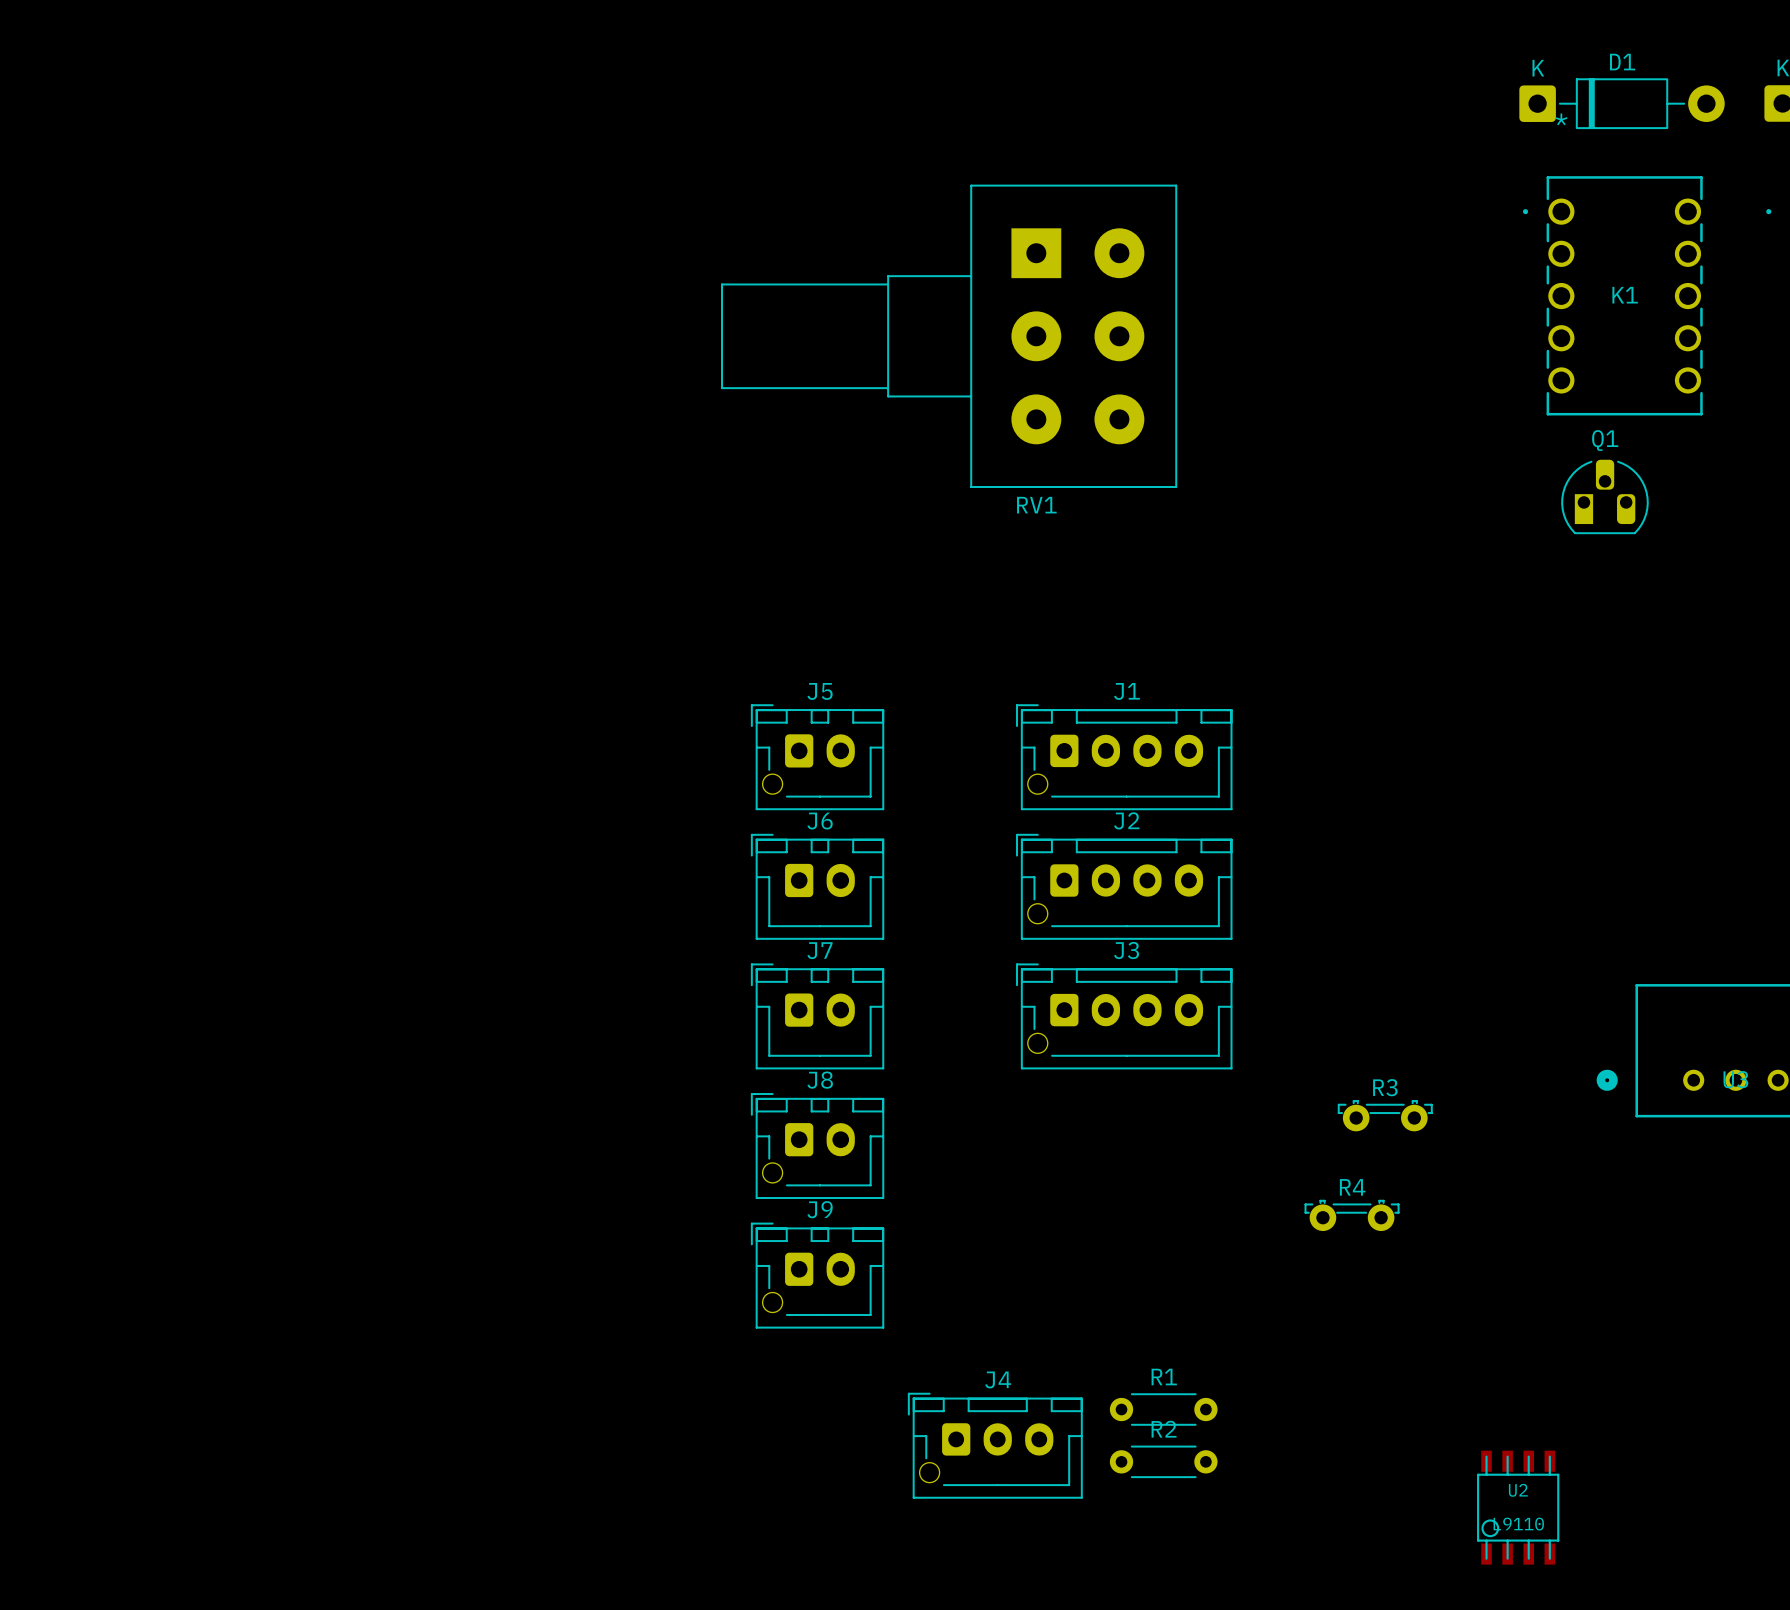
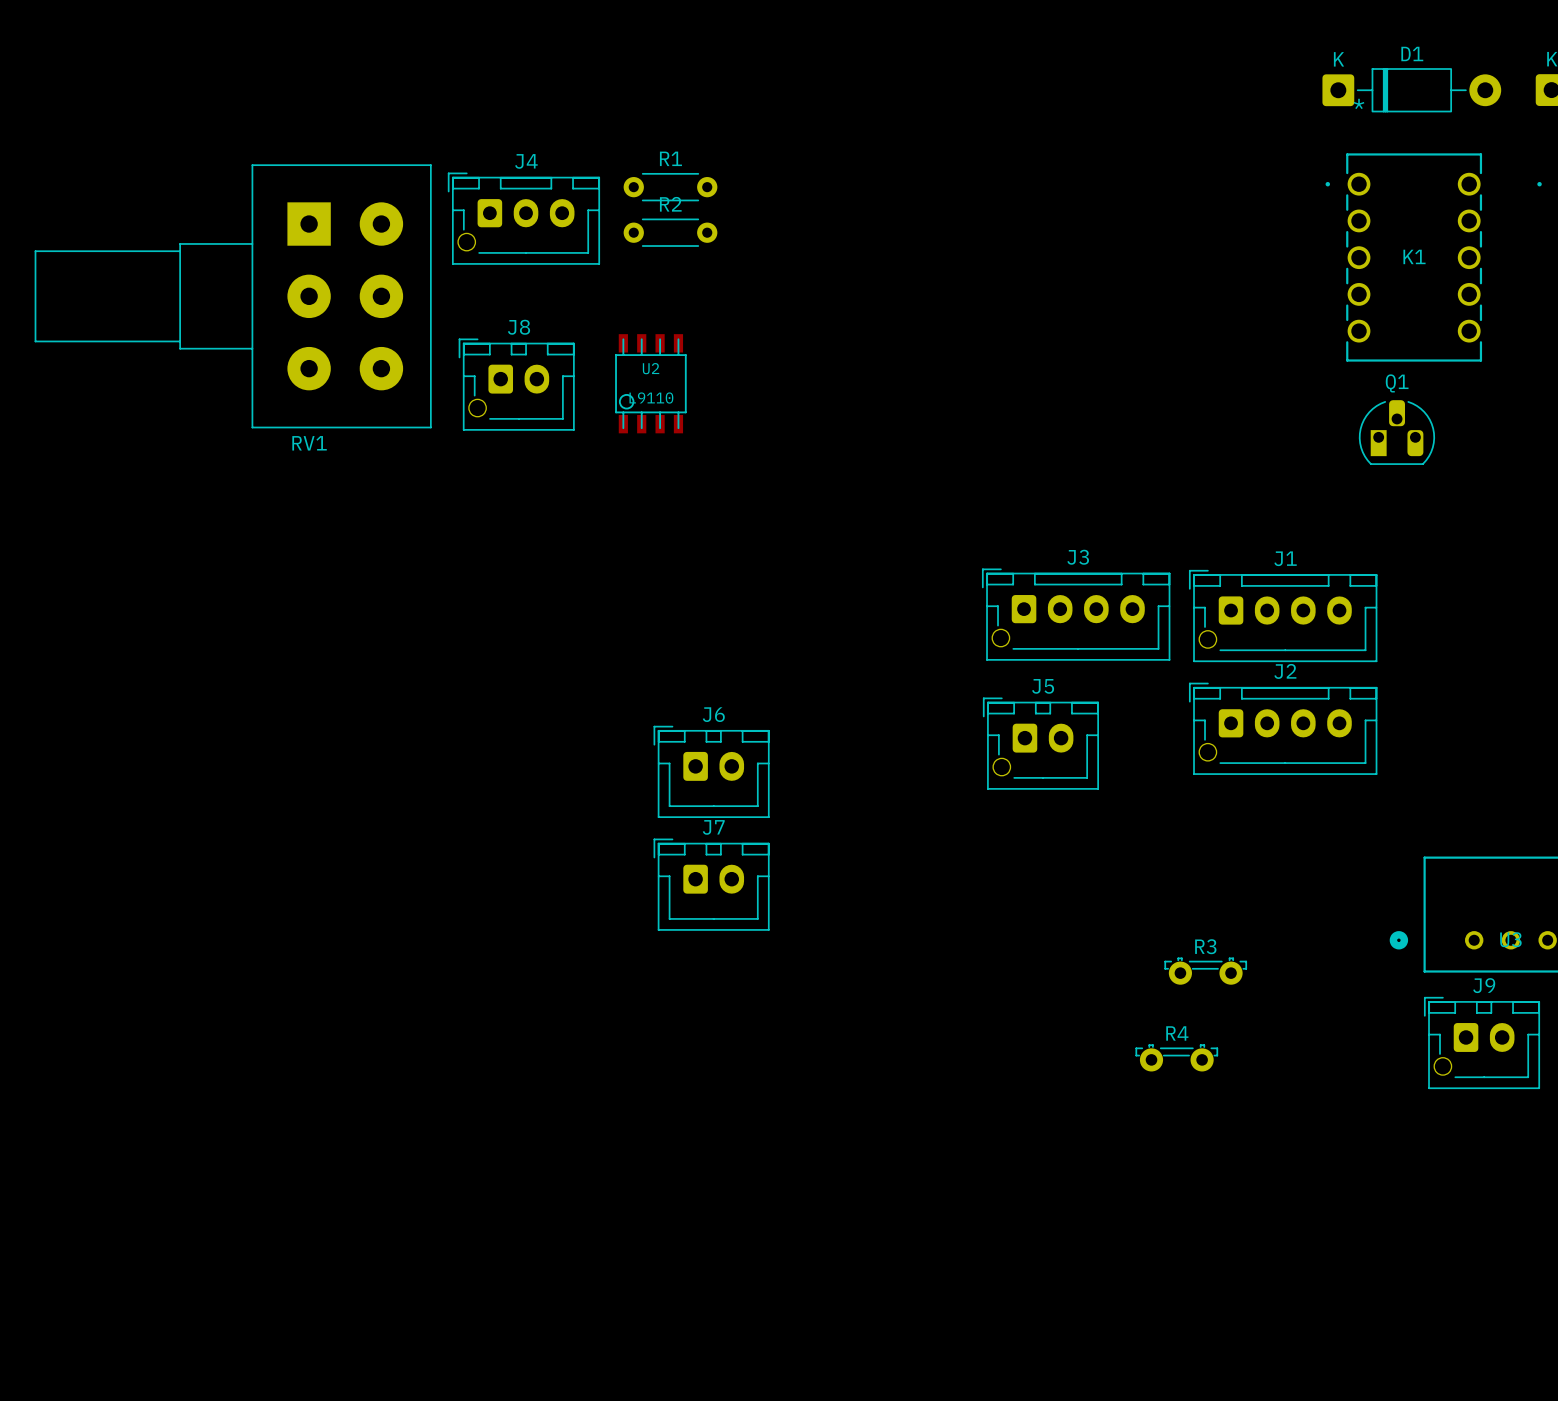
RV1 position: (949, 336) -> (233, 296)
J5 position: (817, 757) -> (1040, 743)
J1 position: (1124, 757) -> (1283, 616)
J2 position: (1124, 886) -> (1283, 728)
J3 position: (1124, 1016) -> (1076, 614)
J8 position: (817, 1146) -> (516, 384)
J9 position: (817, 1275) -> (1482, 1042)
R1 position: (1163, 1409) -> (670, 187)
J4 position: (995, 1445) -> (523, 218)
R2 position: (1163, 1461) -> (670, 232)
U2 position: (1518, 1507) -> (650, 383)

